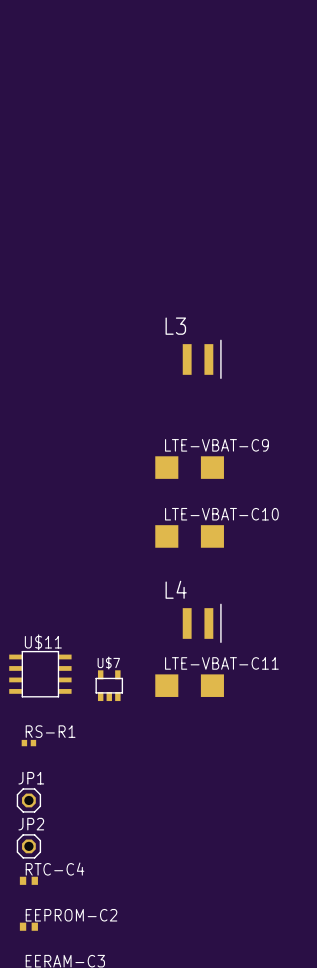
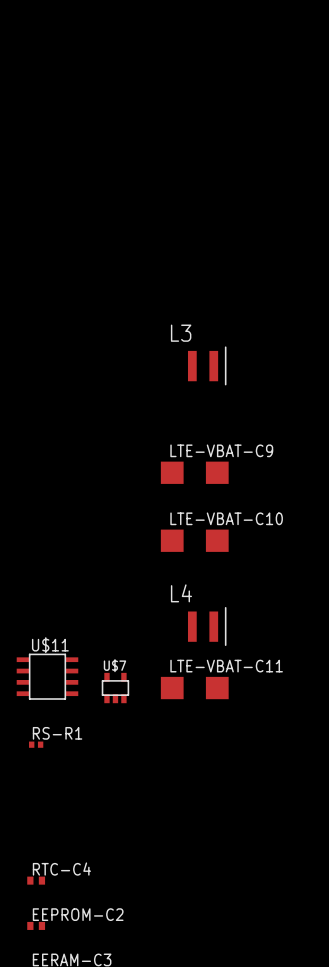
JP1: (28, 800) -> none
JP2: (28, 846) -> none

